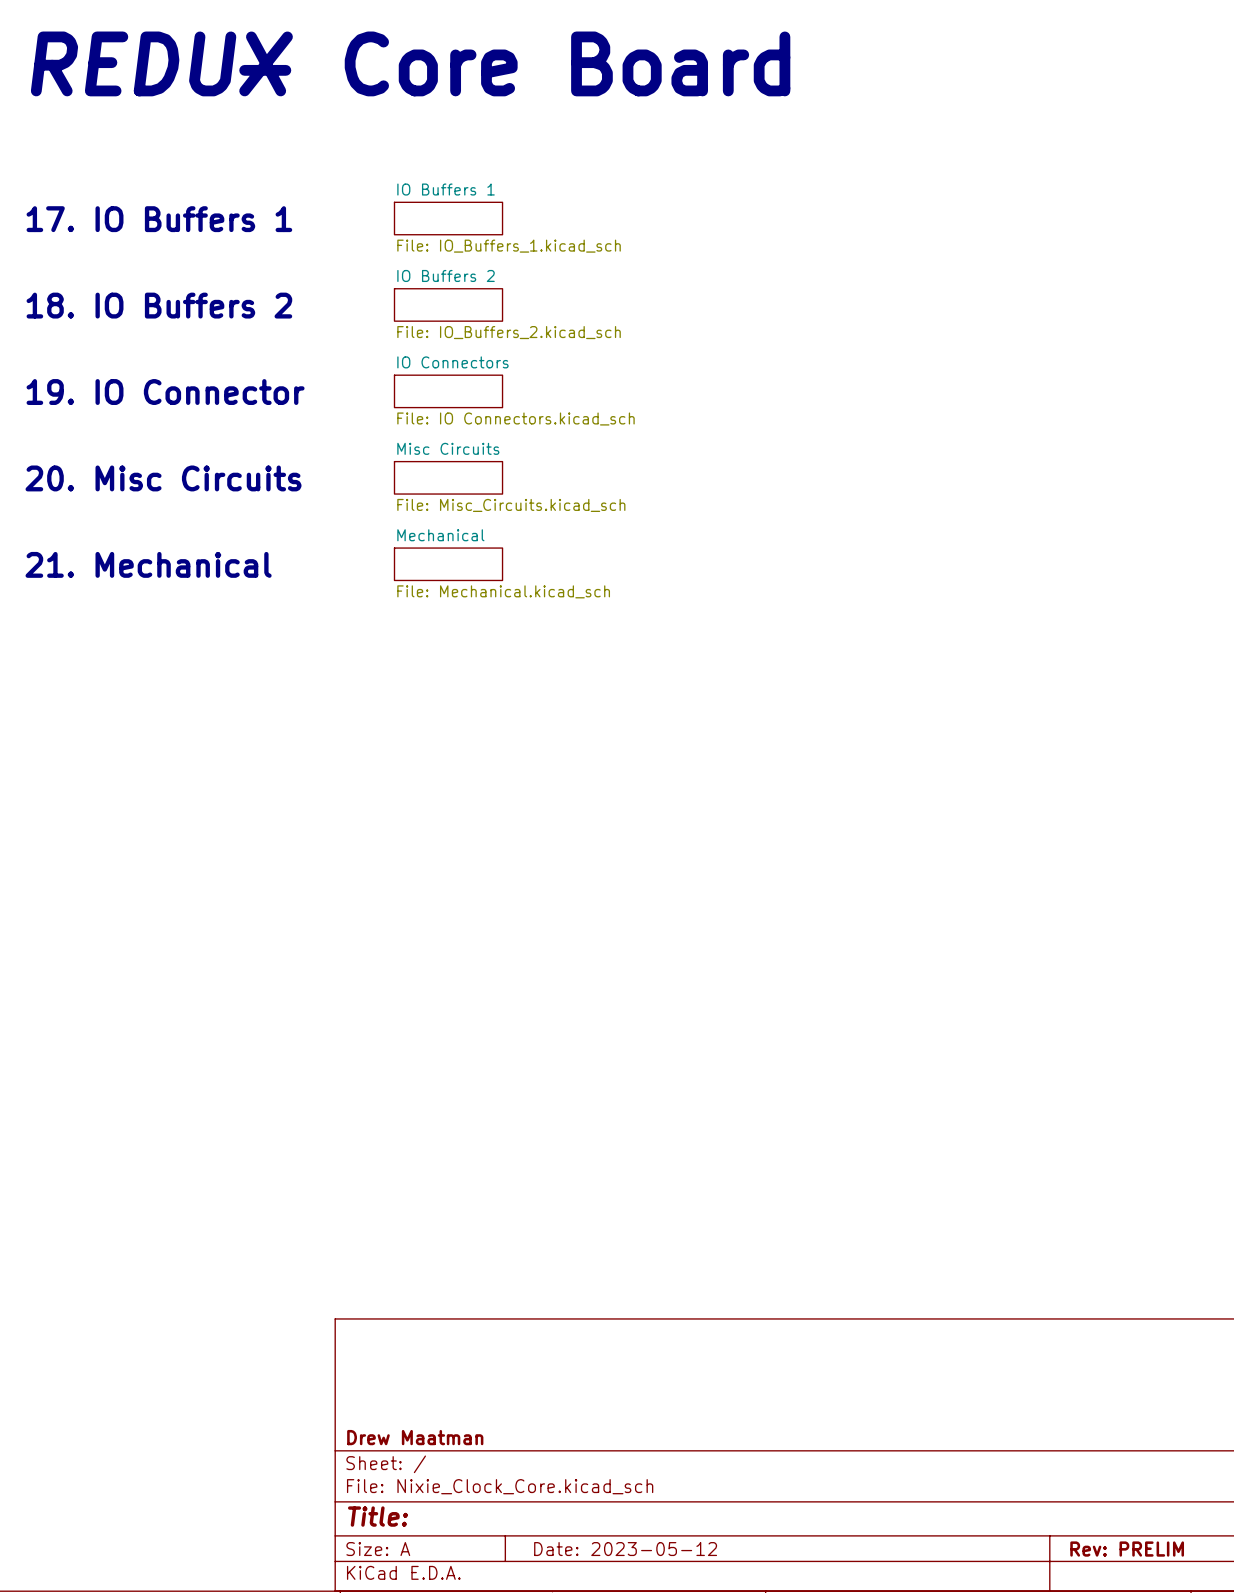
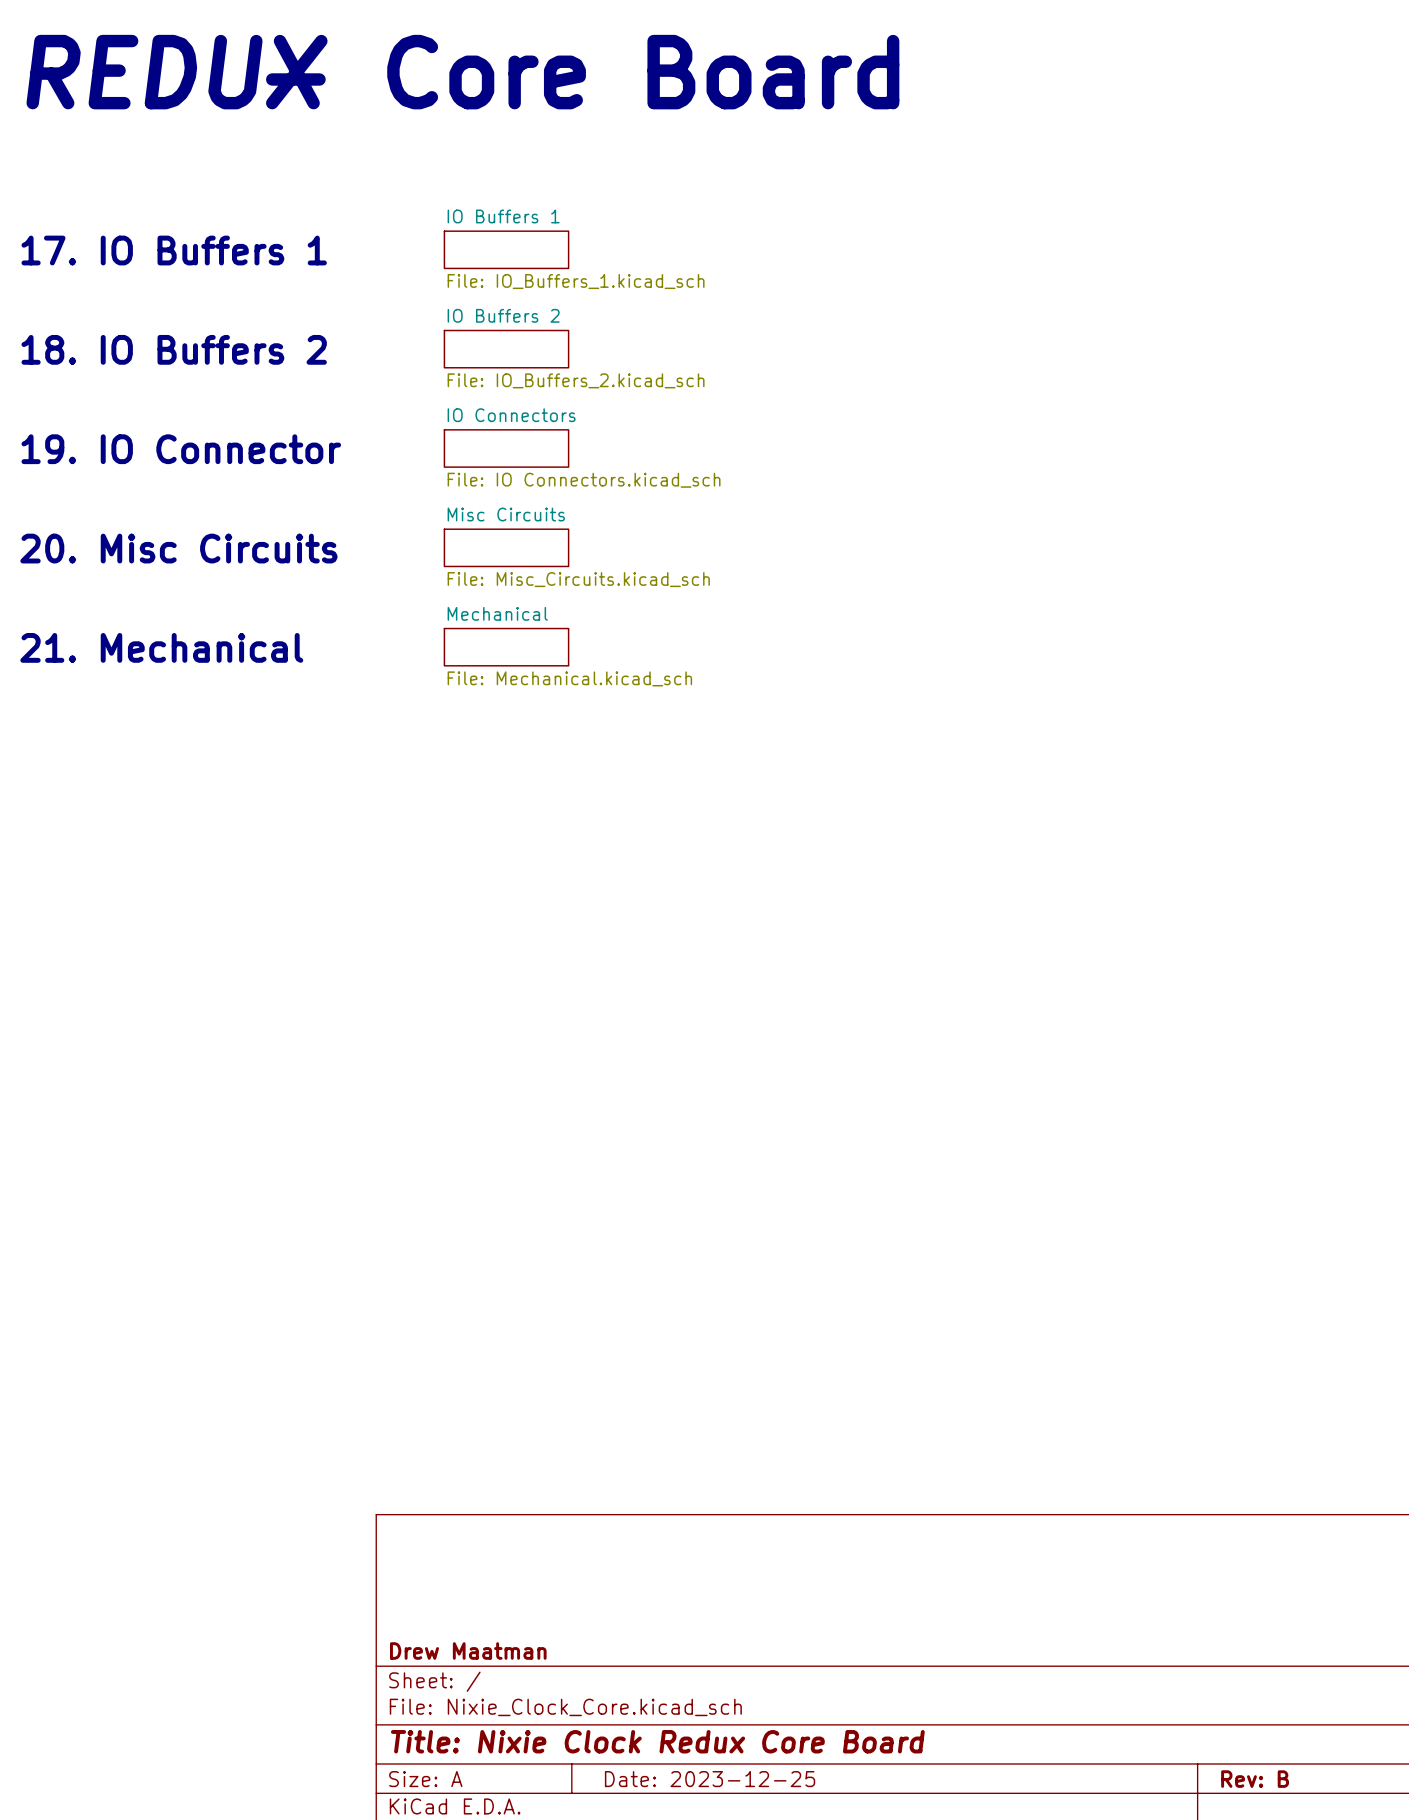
title block: Title: (378, 1516) -> Title: Nixie Clock Redux Core Board (657, 1741)
title block: Date: 2023-05-12 (625, 1549) -> Date: 2023-12-25 (710, 1779)
title block: Rev: PRELIM (1127, 1549) -> Rev: B (1255, 1779)

